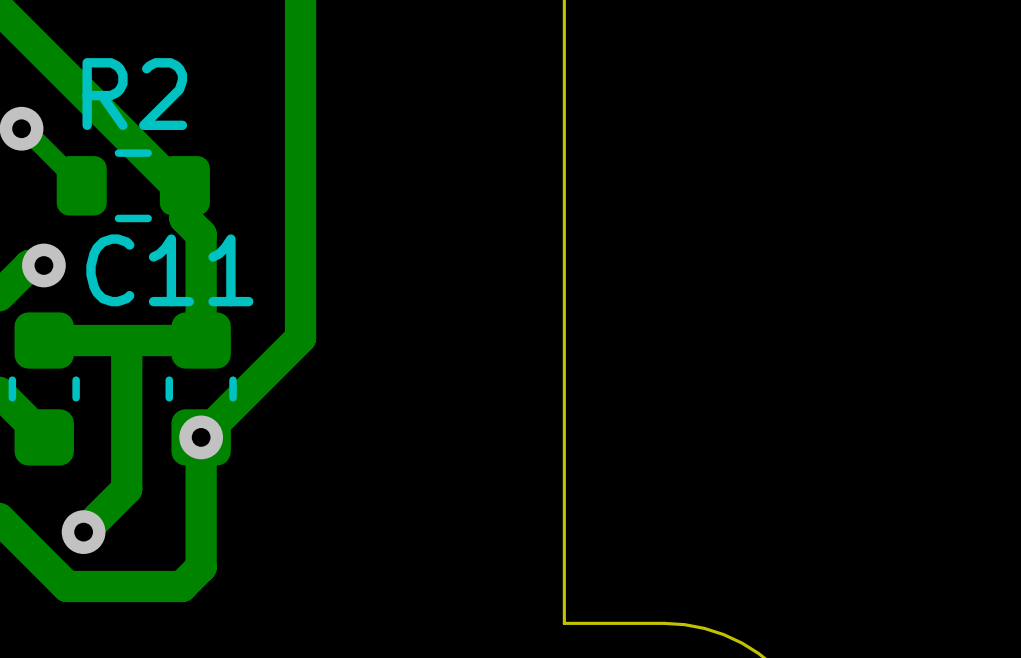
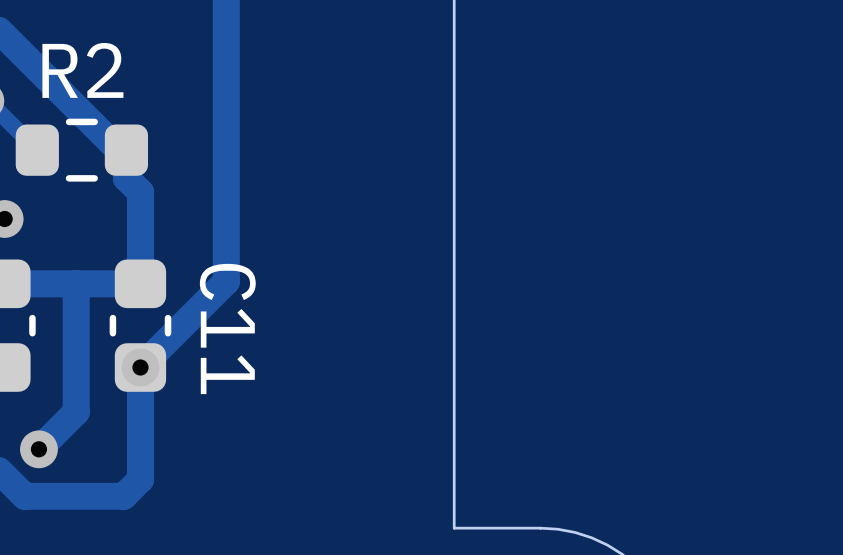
C11 name rotation: 0° (169, 270) -> 90° clockwise (227, 328)

